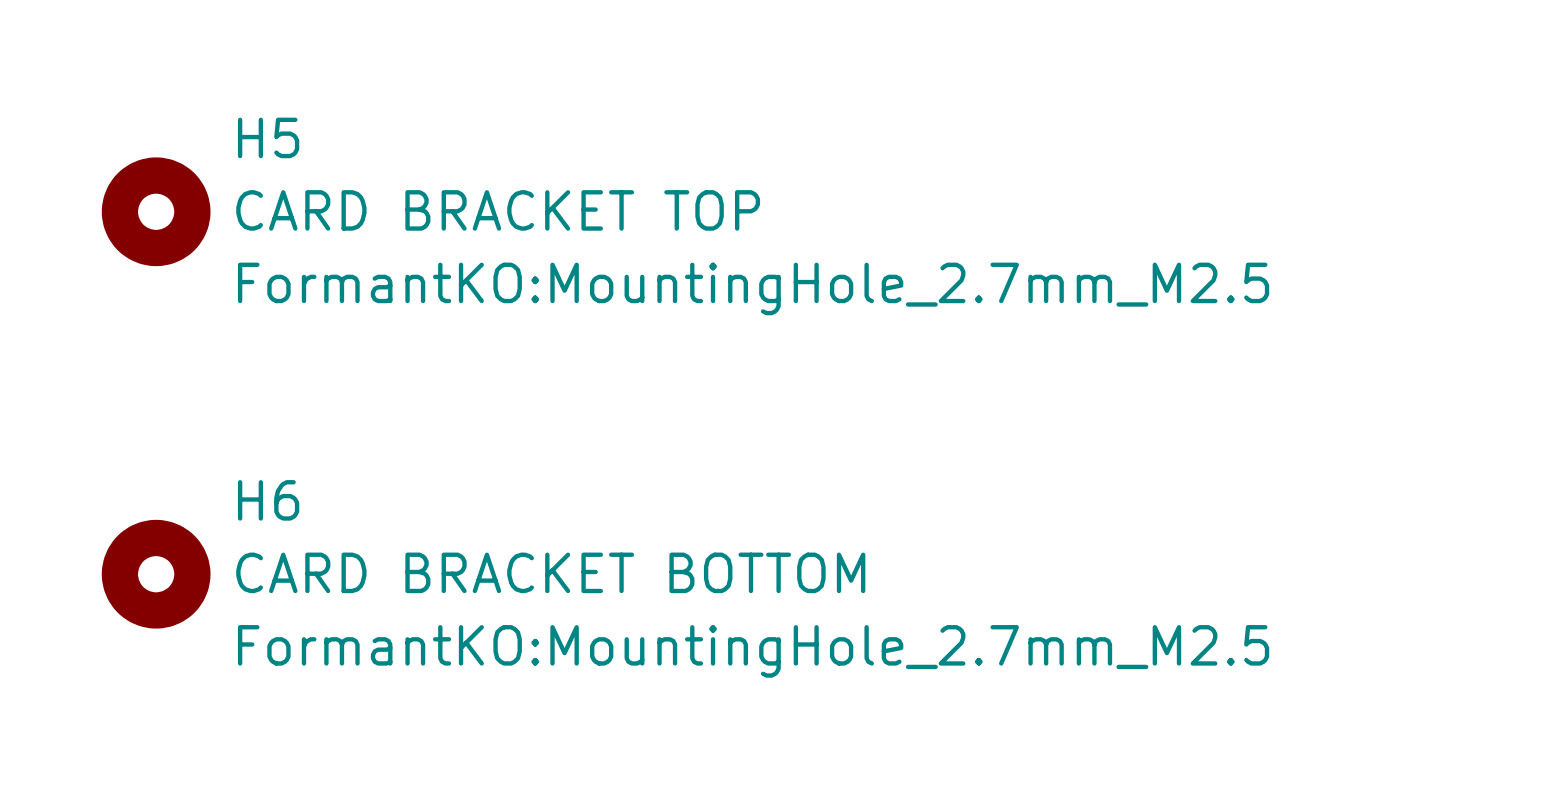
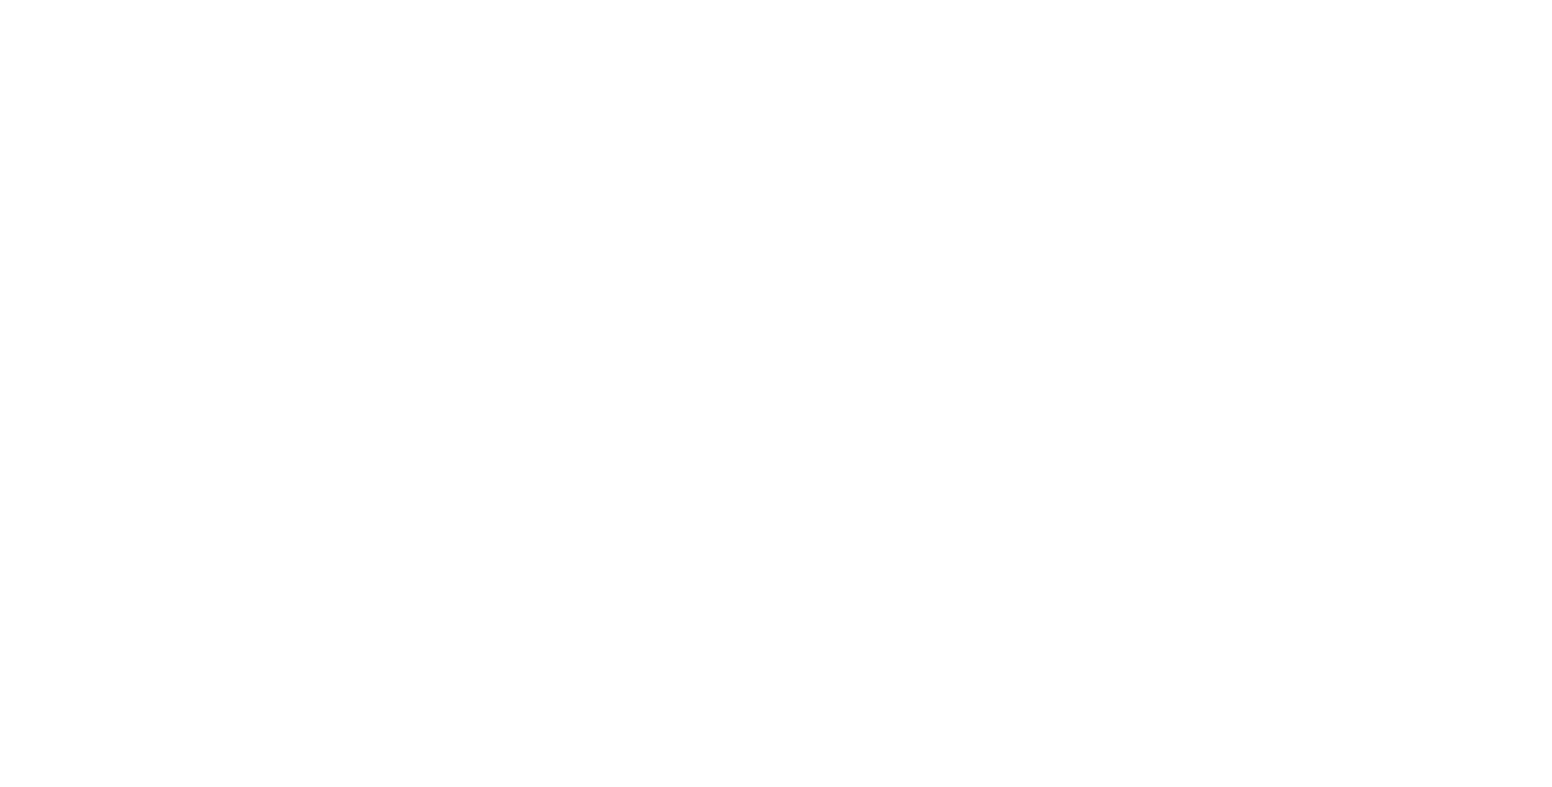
H5: CARD BRACKET TOP (156, 211) -> none
H6: CARD BRACKET BOTTOM (156, 574) -> none

